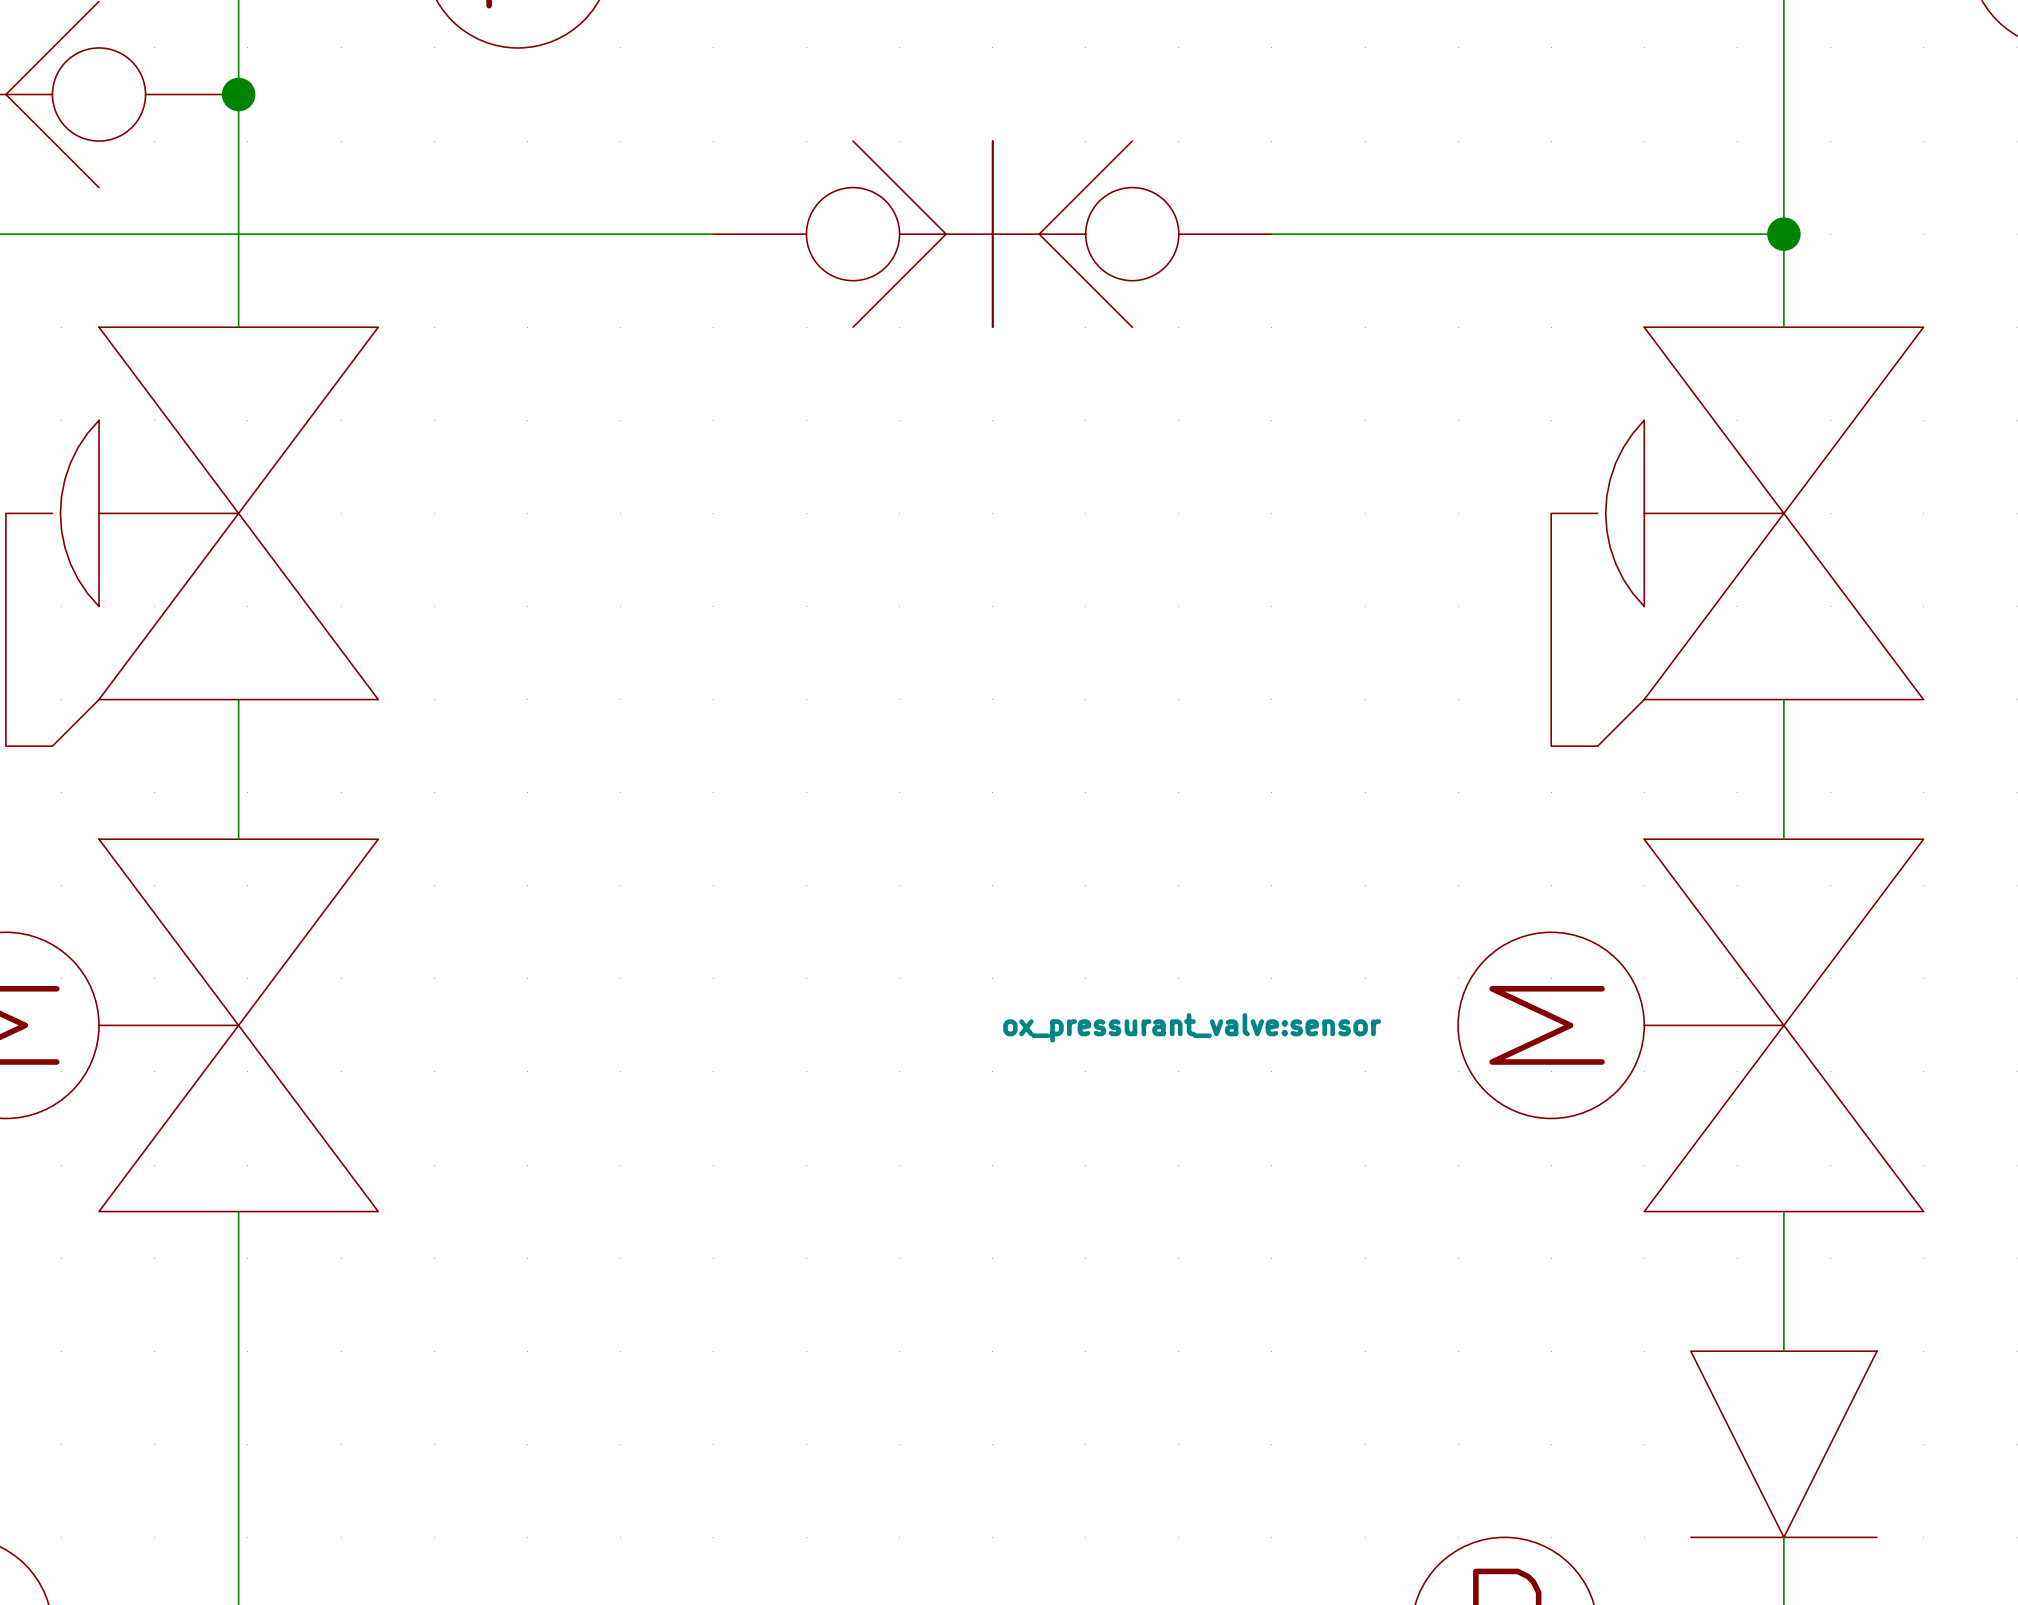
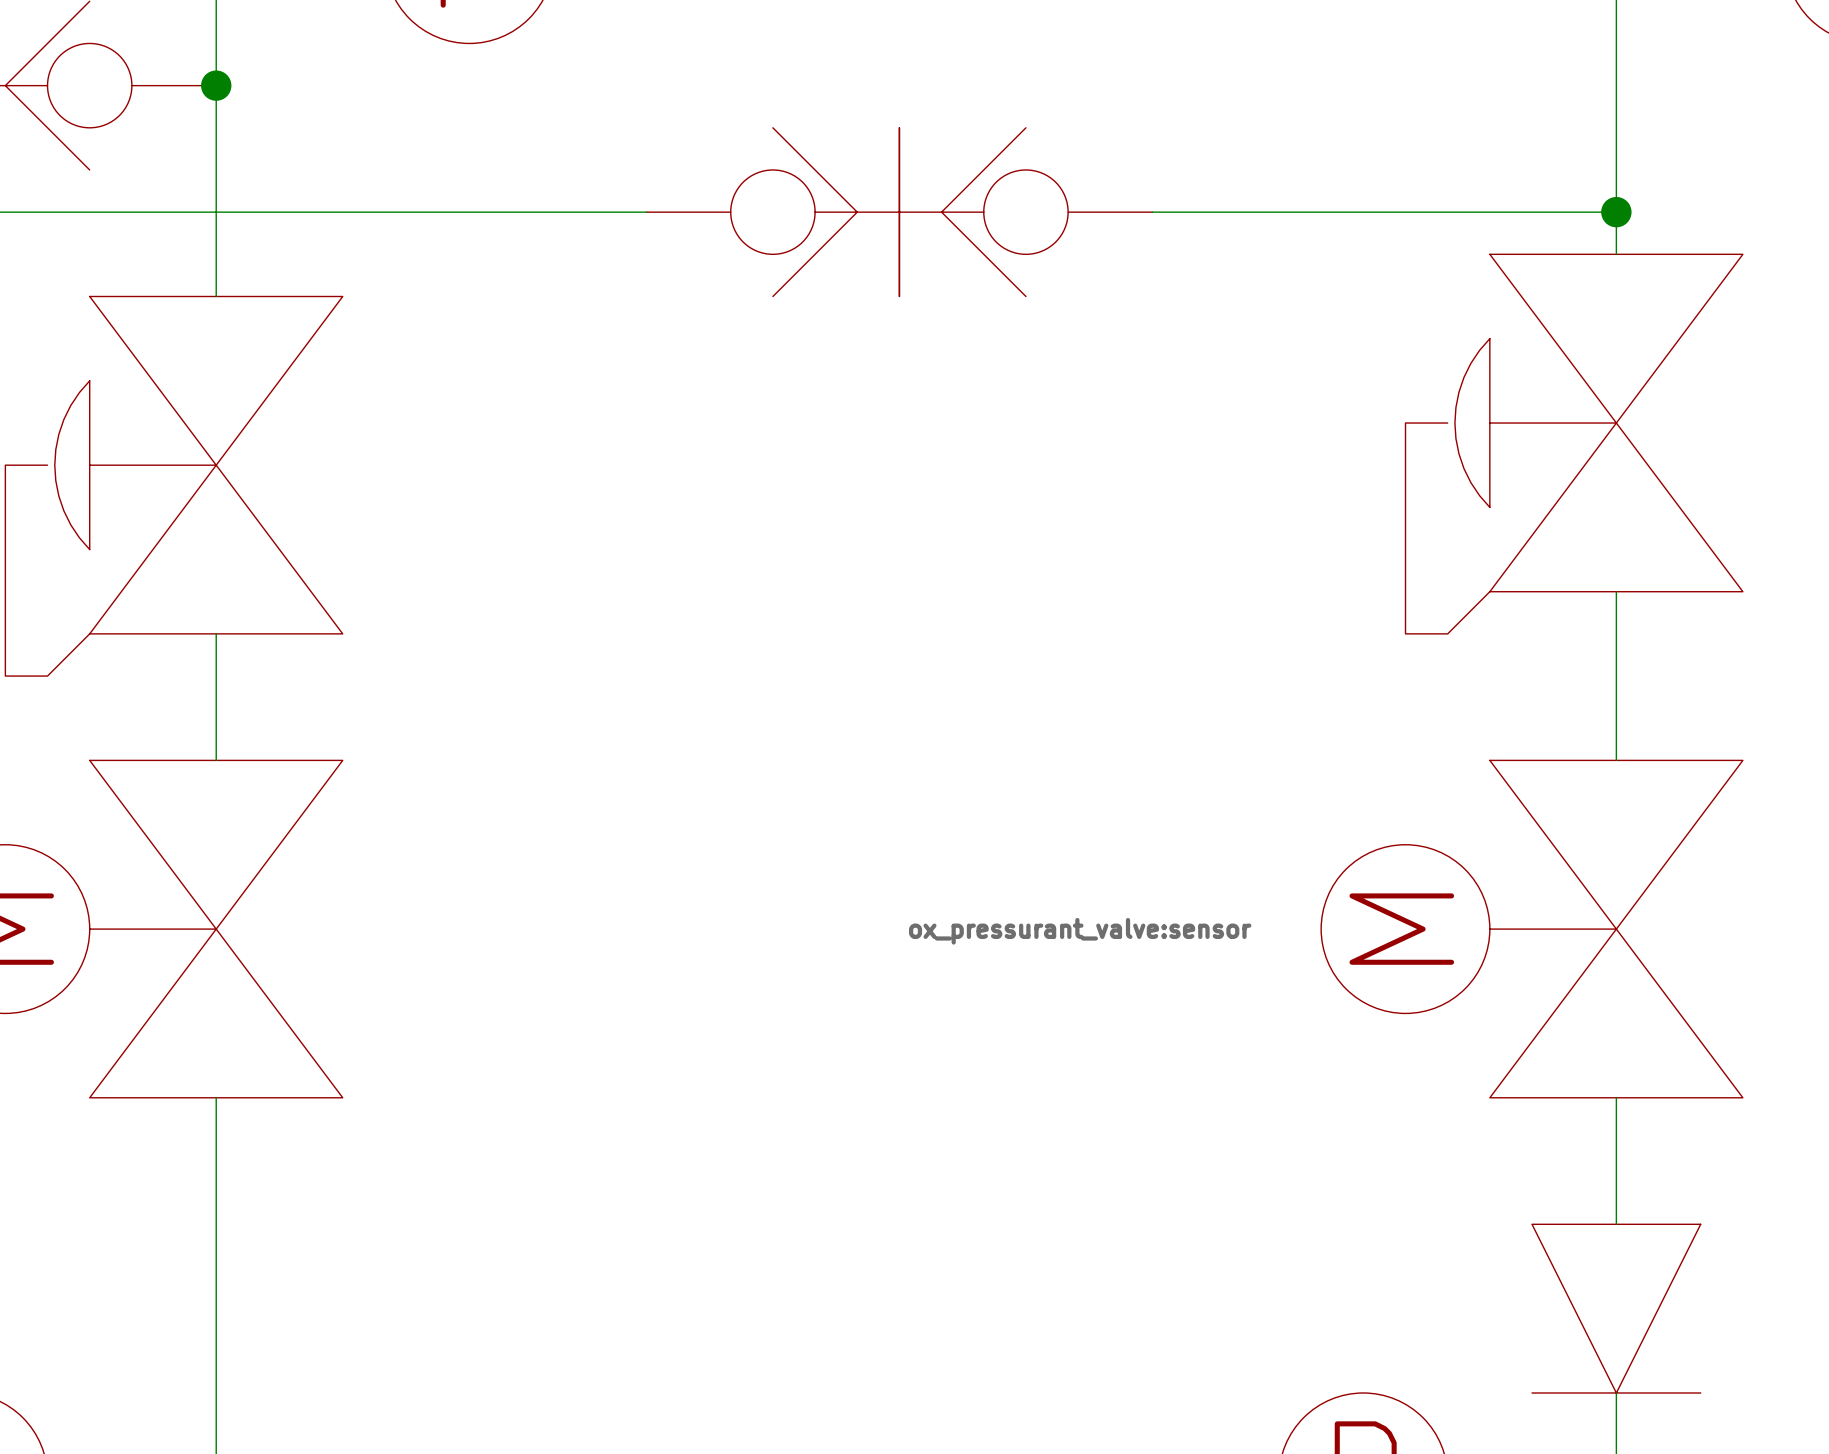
wire: (1783, 280) (1783, 327) -> (1616, 591) (1616, 633)
part position: (1737, 536) -> (1574, 444)

